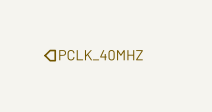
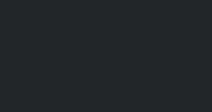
hierarchical label: PCLK_40MHZ (100, 55) -> none

